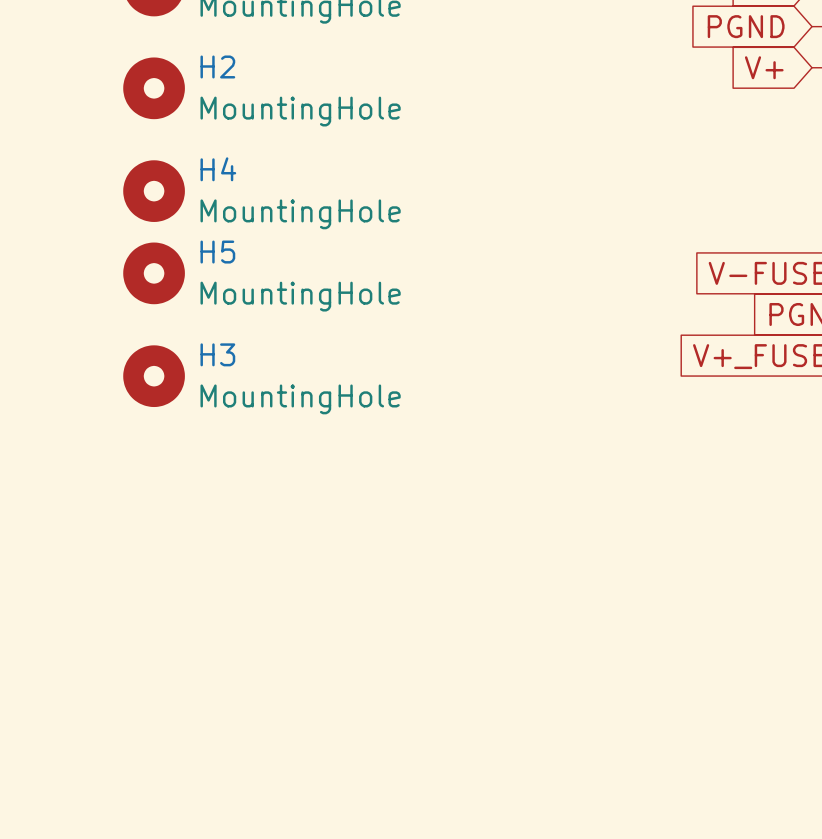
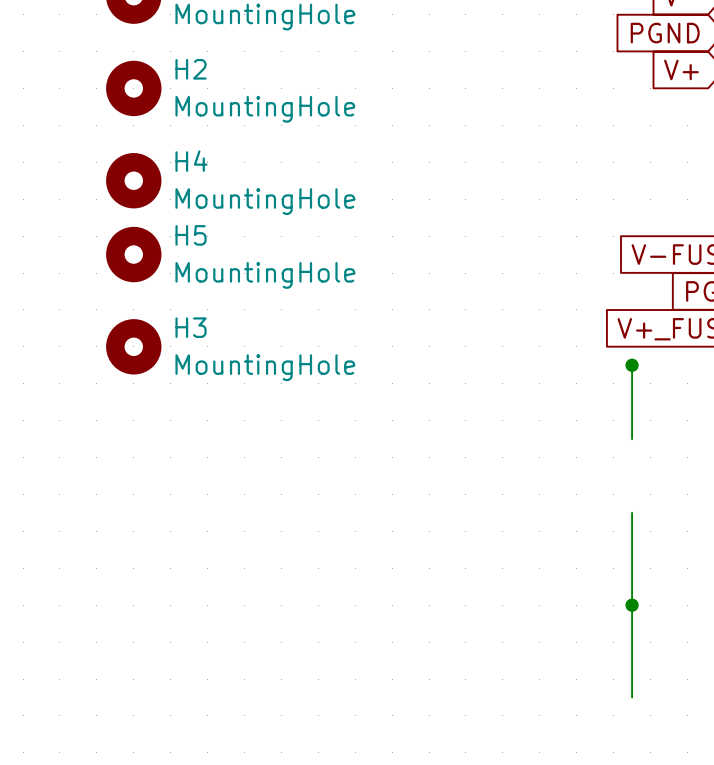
wire: none -> (632, 365) (632, 439)
junction: none -> (632, 365)
wire: none -> (632, 512) (632, 697)
junction: none -> (632, 605)

